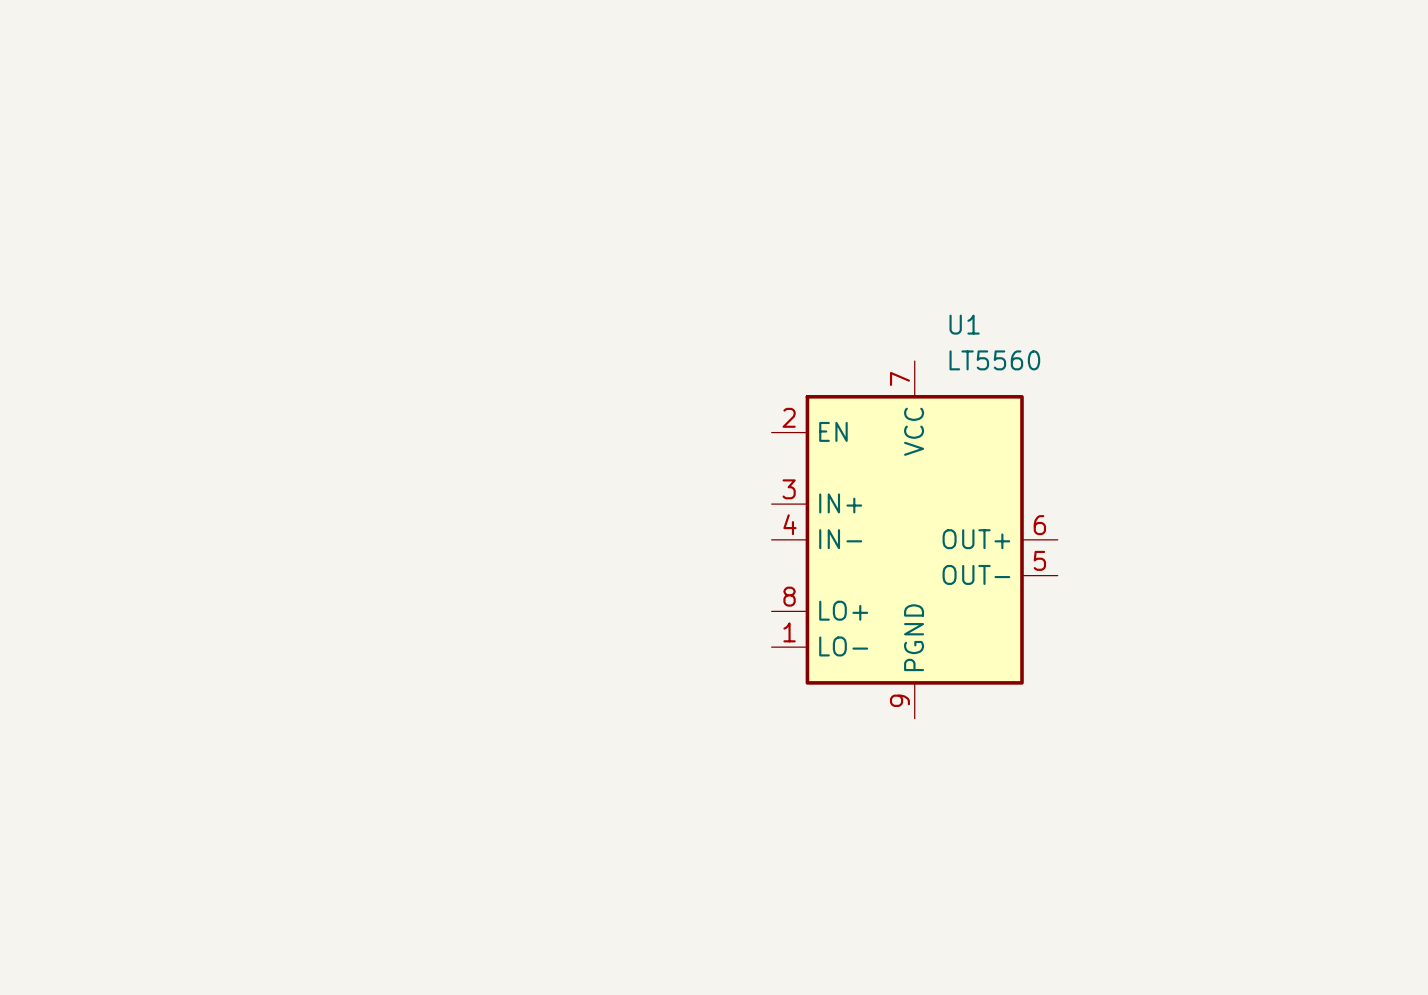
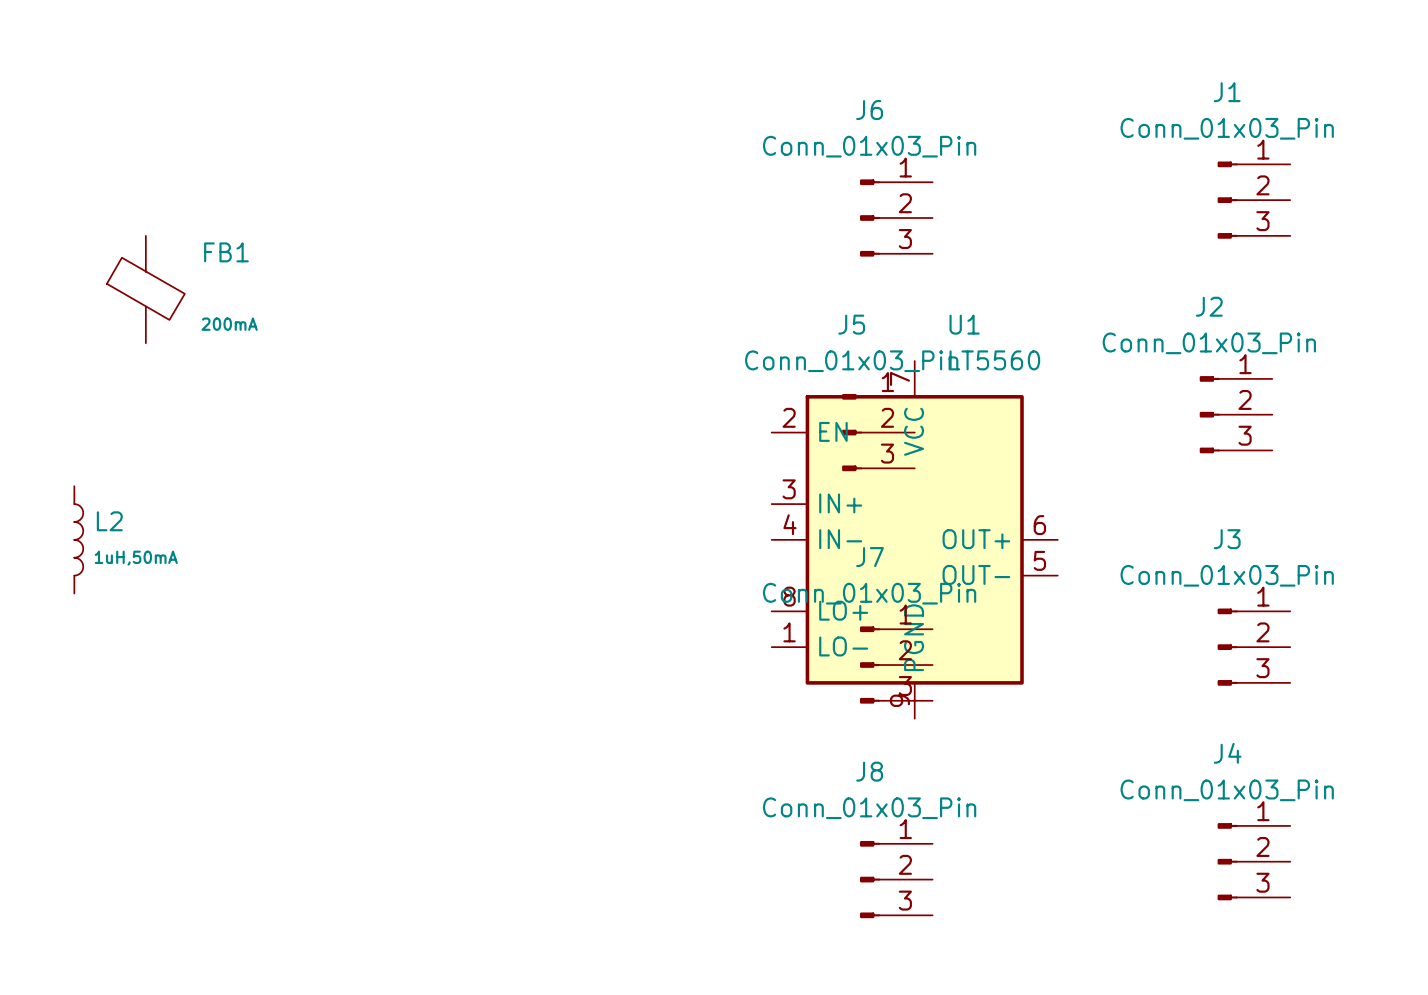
J1: none -> Conn_01x03_Pin (1253, 200)
J6: none -> Conn_01x03_Pin (896, 218)
FB1: none -> (145, 289)
J2: none -> Conn_01x03_Pin (1236, 414)
J5: none -> Conn_01x03_Pin (878, 432)
L2: none -> 1uH,50mA (78, 539)
J3: none -> Conn_01x03_Pin (1253, 647)
J7: none -> Conn_01x03_Pin (896, 665)
J4: none -> Conn_01x03_Pin (1253, 861)
J8: none -> Conn_01x03_Pin (896, 879)

